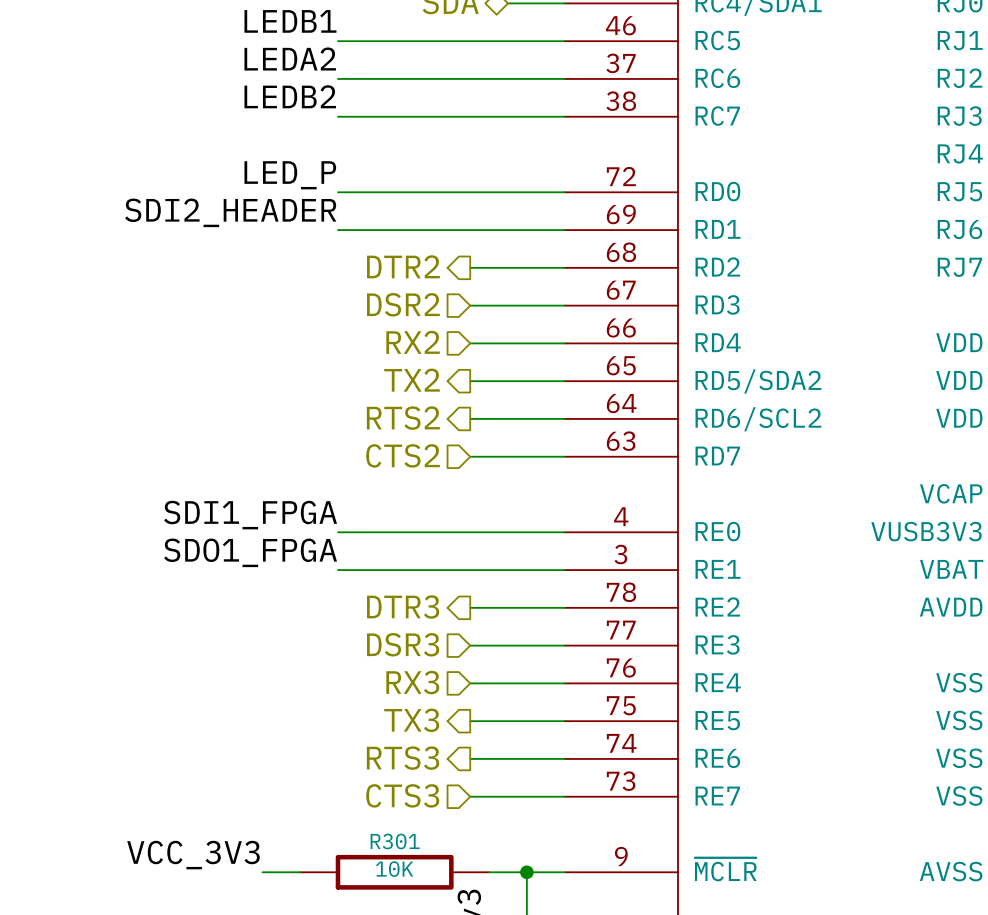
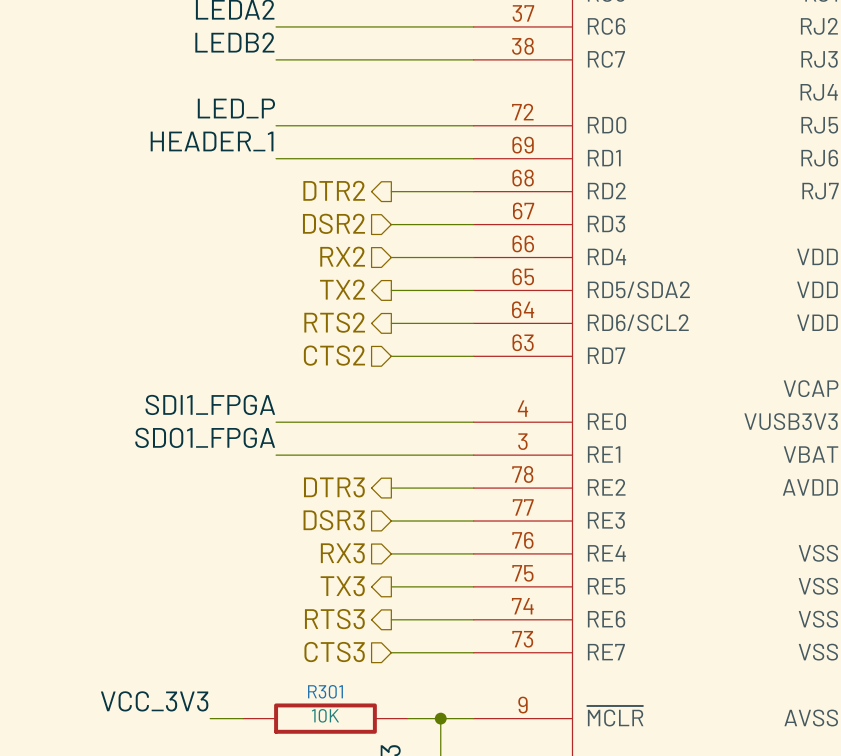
label: SDI2_HEADER (230, 212) -> HEADER_1 (212, 141)

